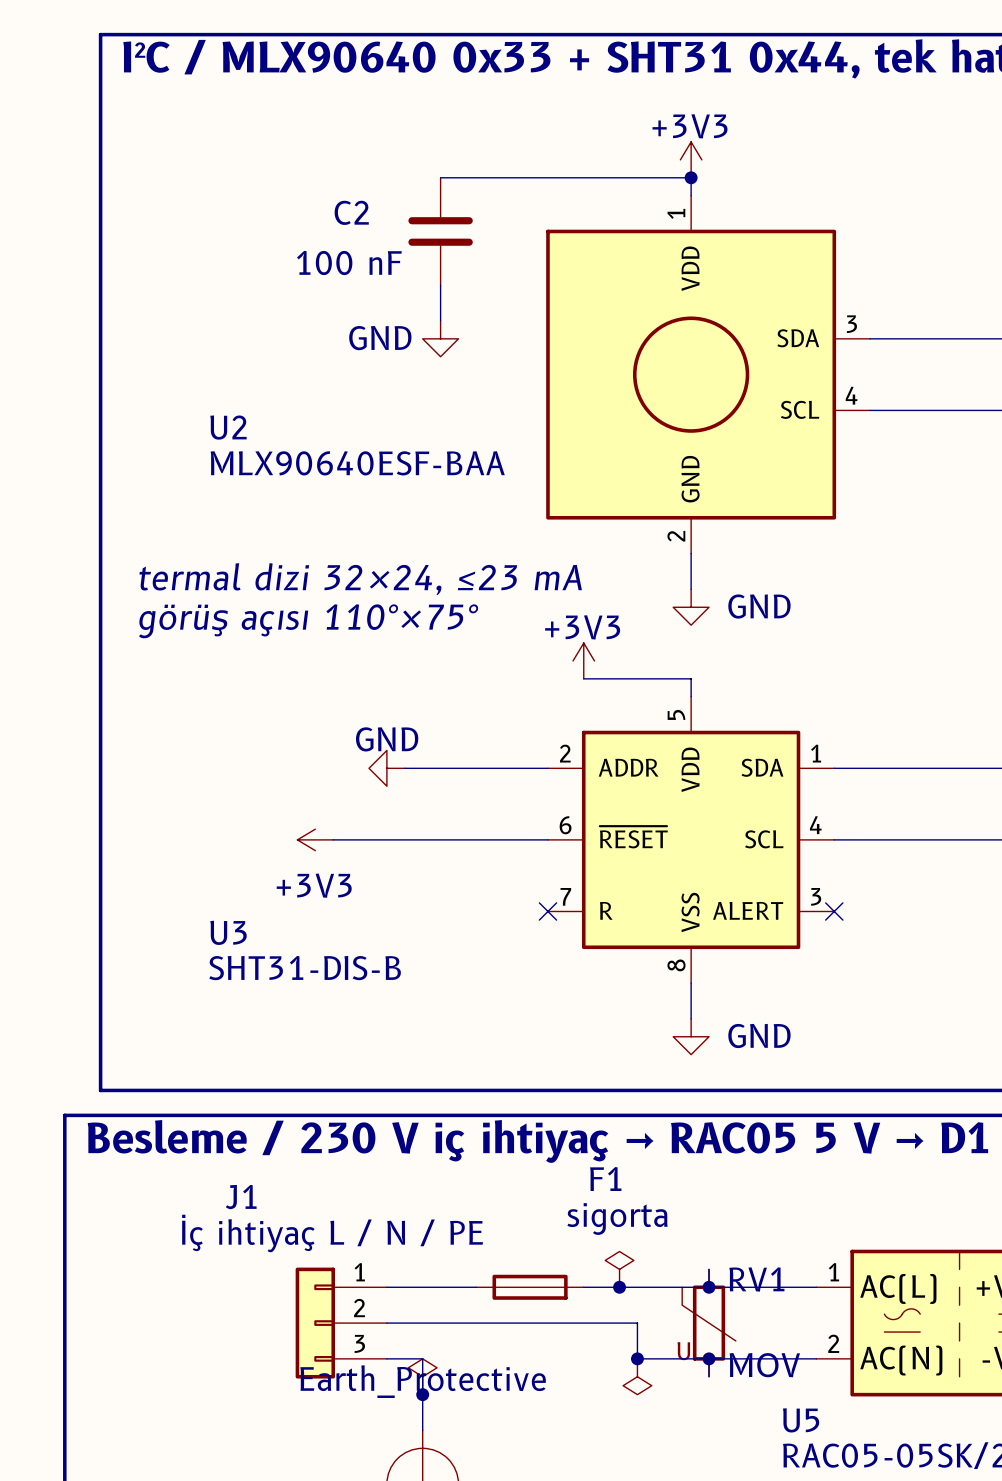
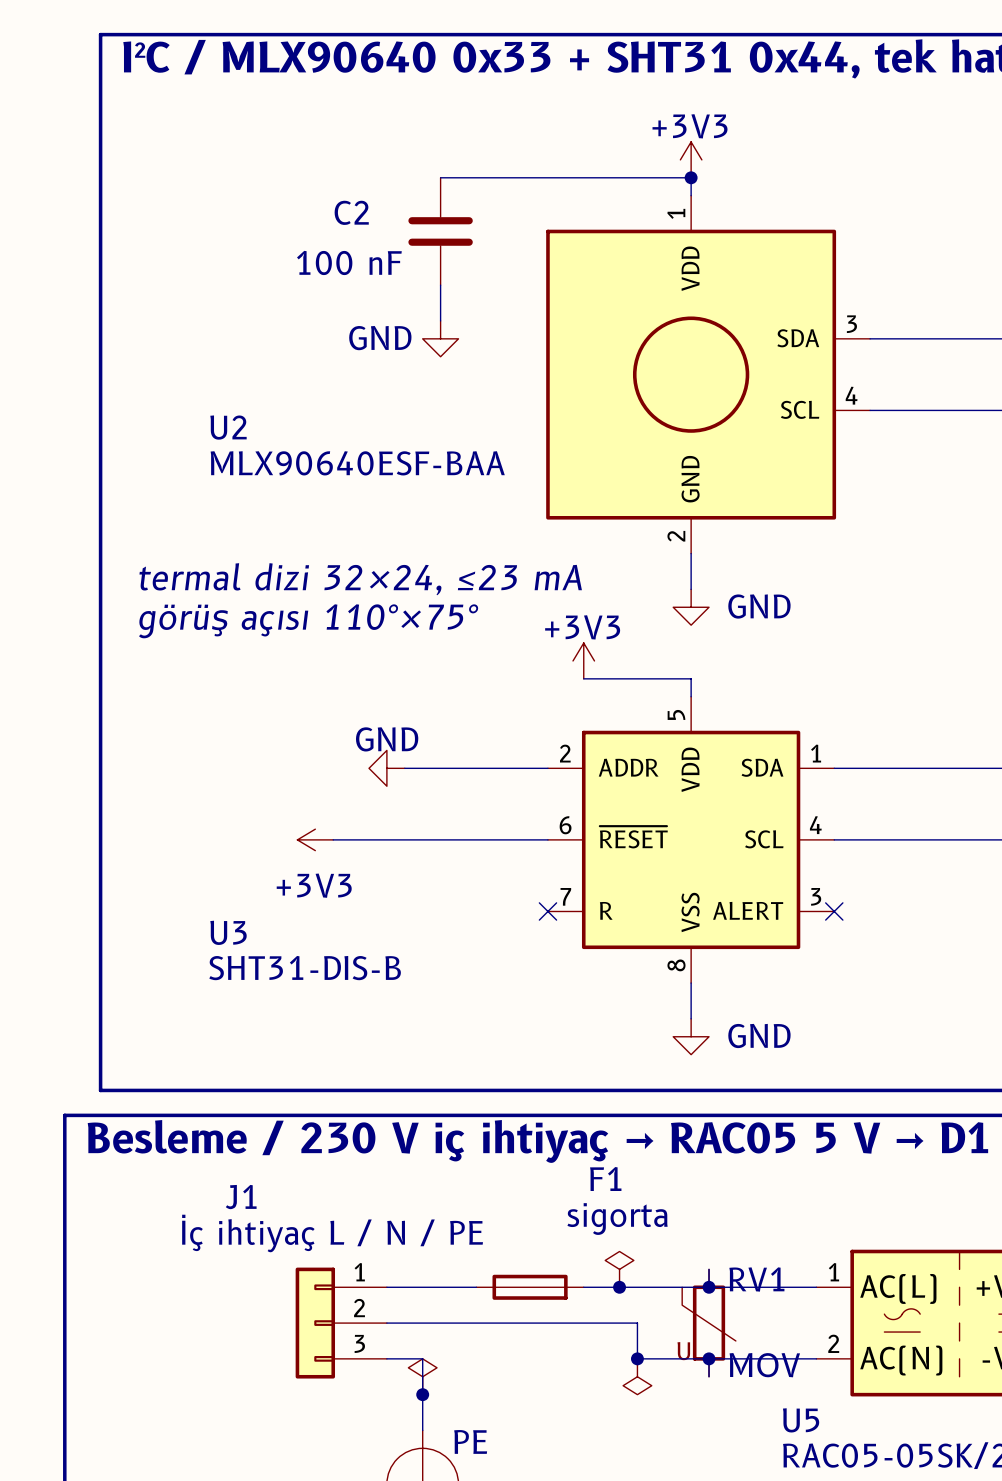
power symbol text: Earth_Protective (423, 1381) -> none
text: none -> PE (470, 1441)

